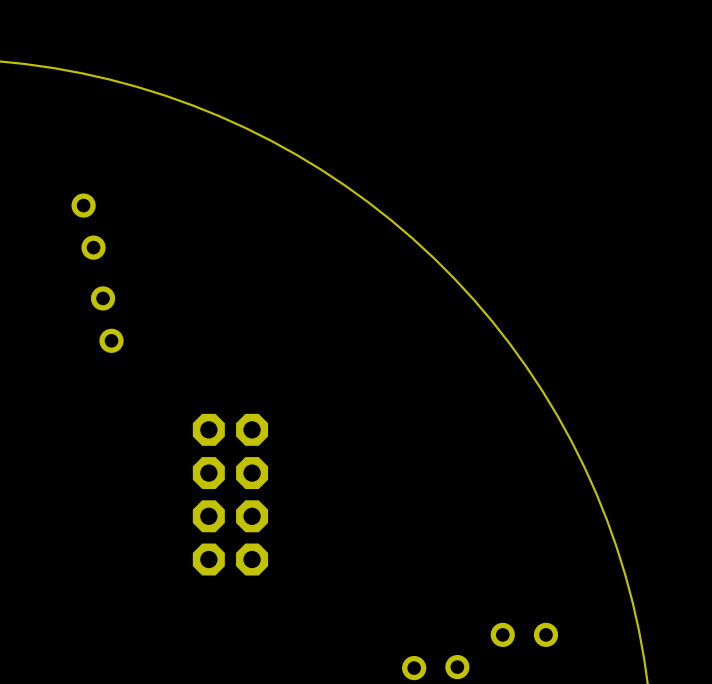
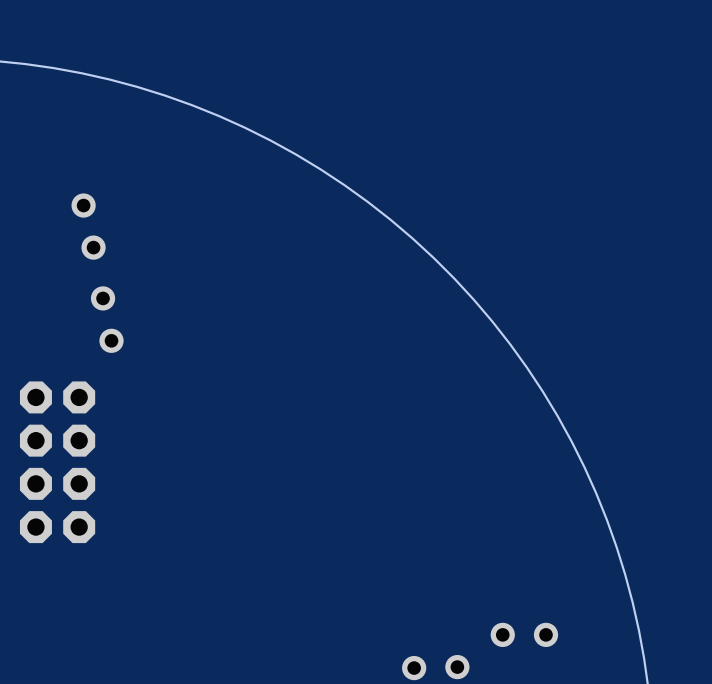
part position: (230, 494) -> (57, 462)

